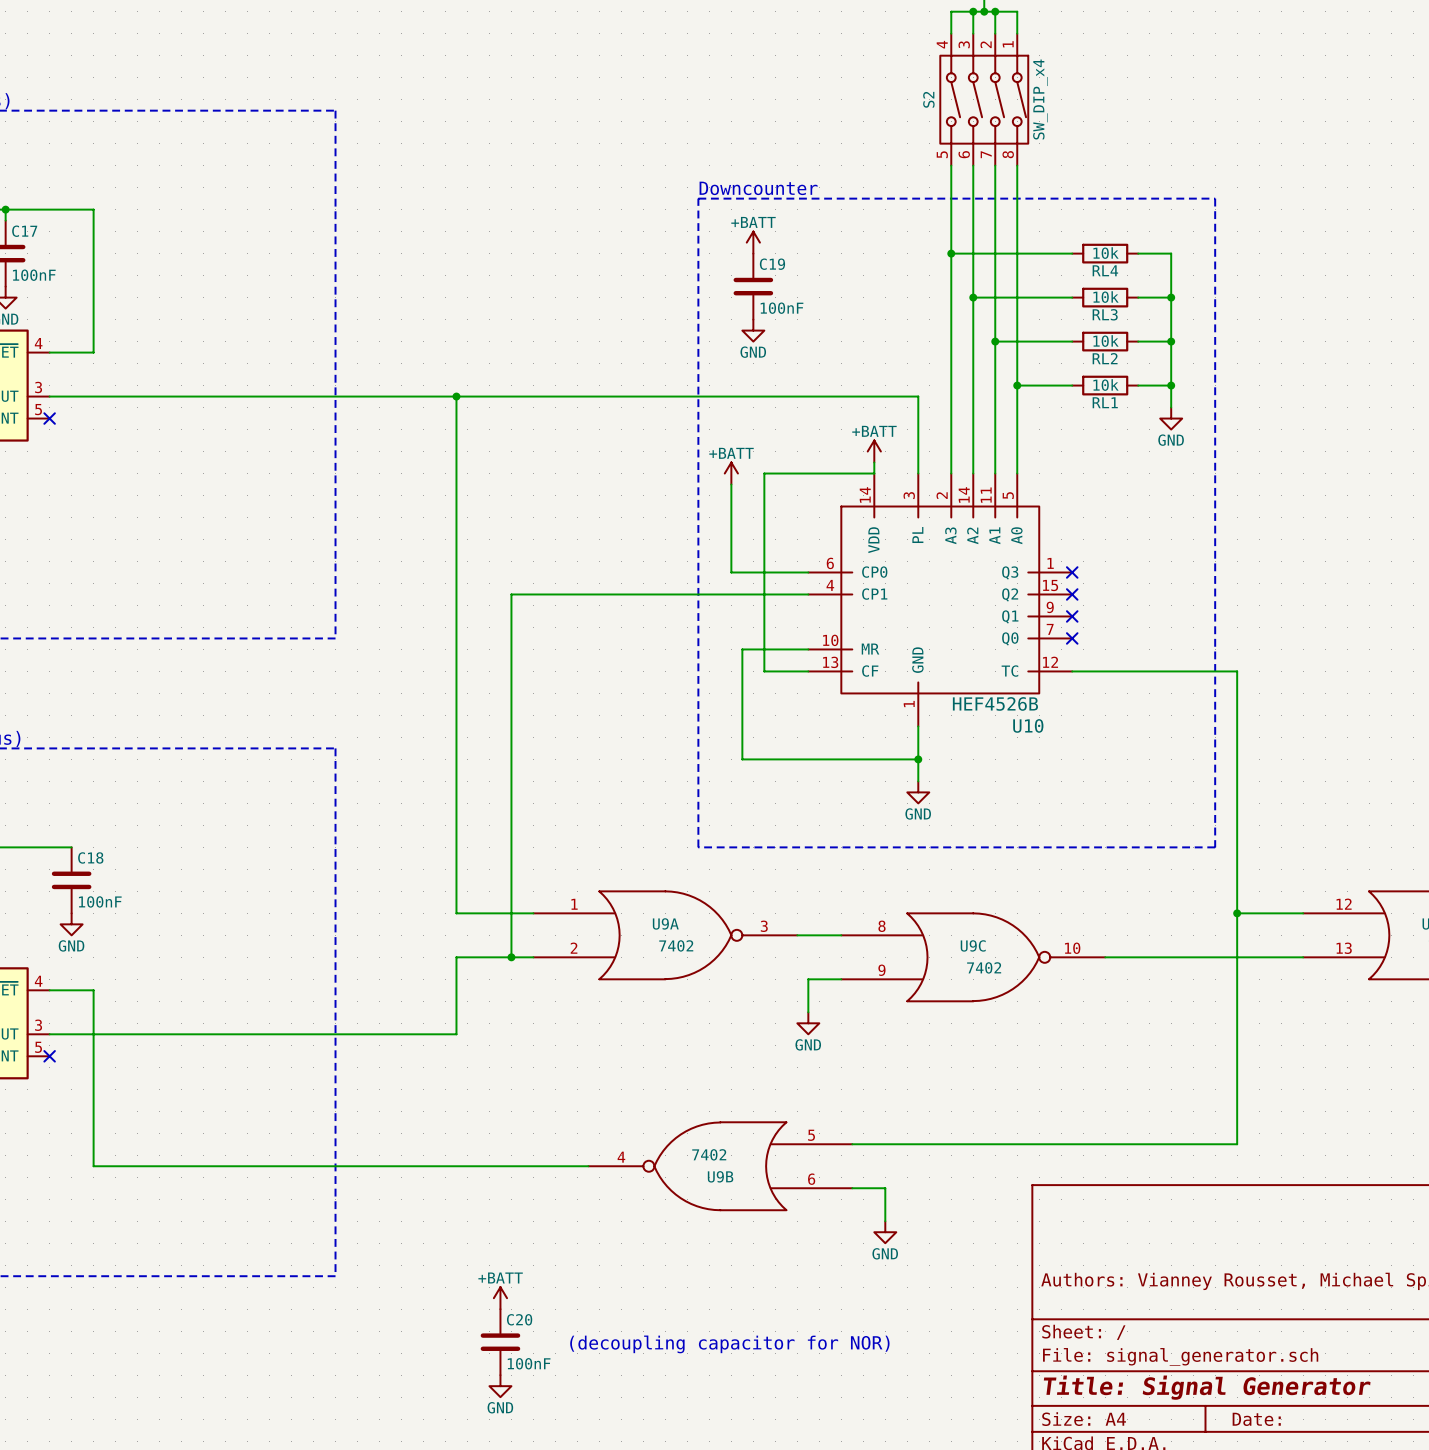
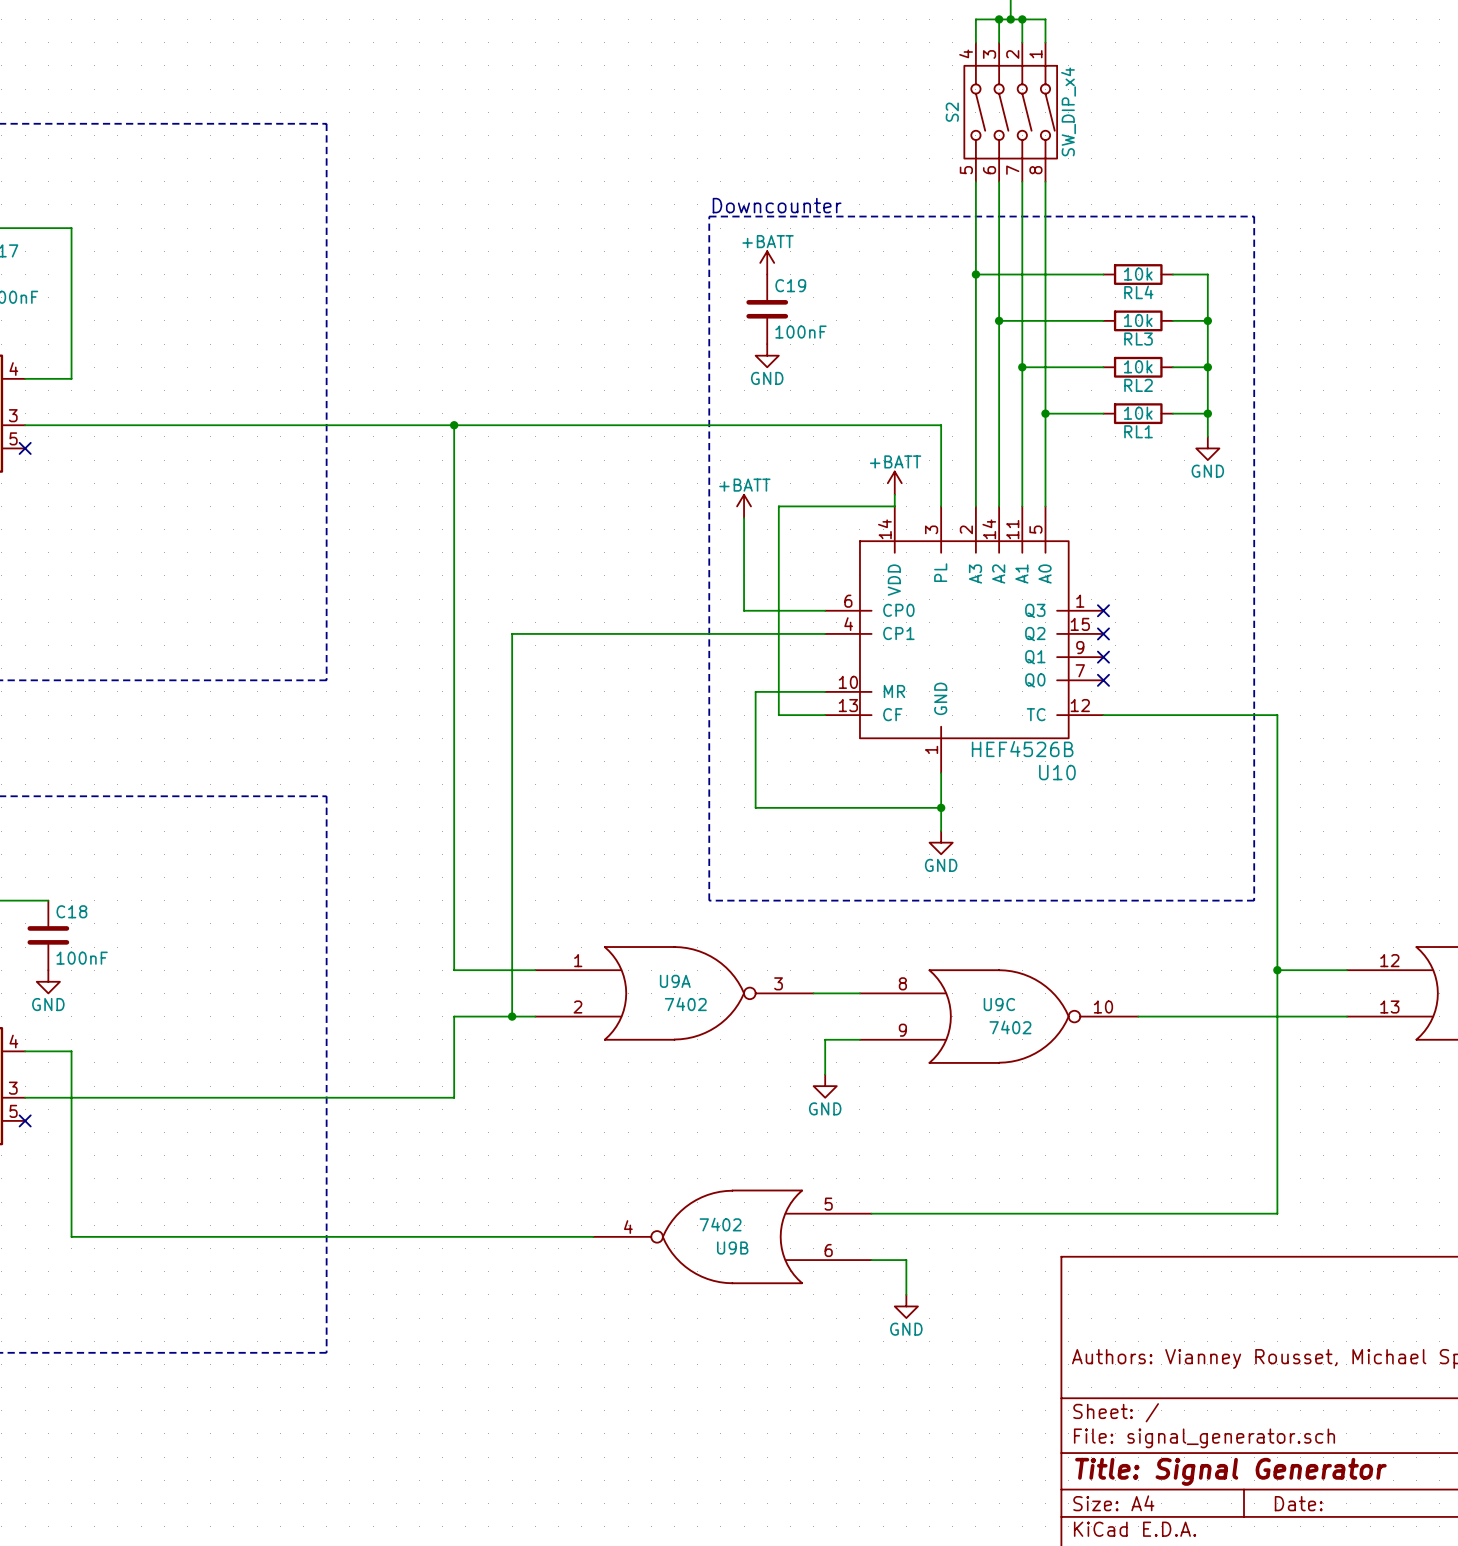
power symbol: +BATT (500, 1298) -> none
C20: 100nF (500, 1342) -> none
text: (decoupling capacitor for NOR) (729, 1344) -> none
power symbol: GND (500, 1386) -> none

